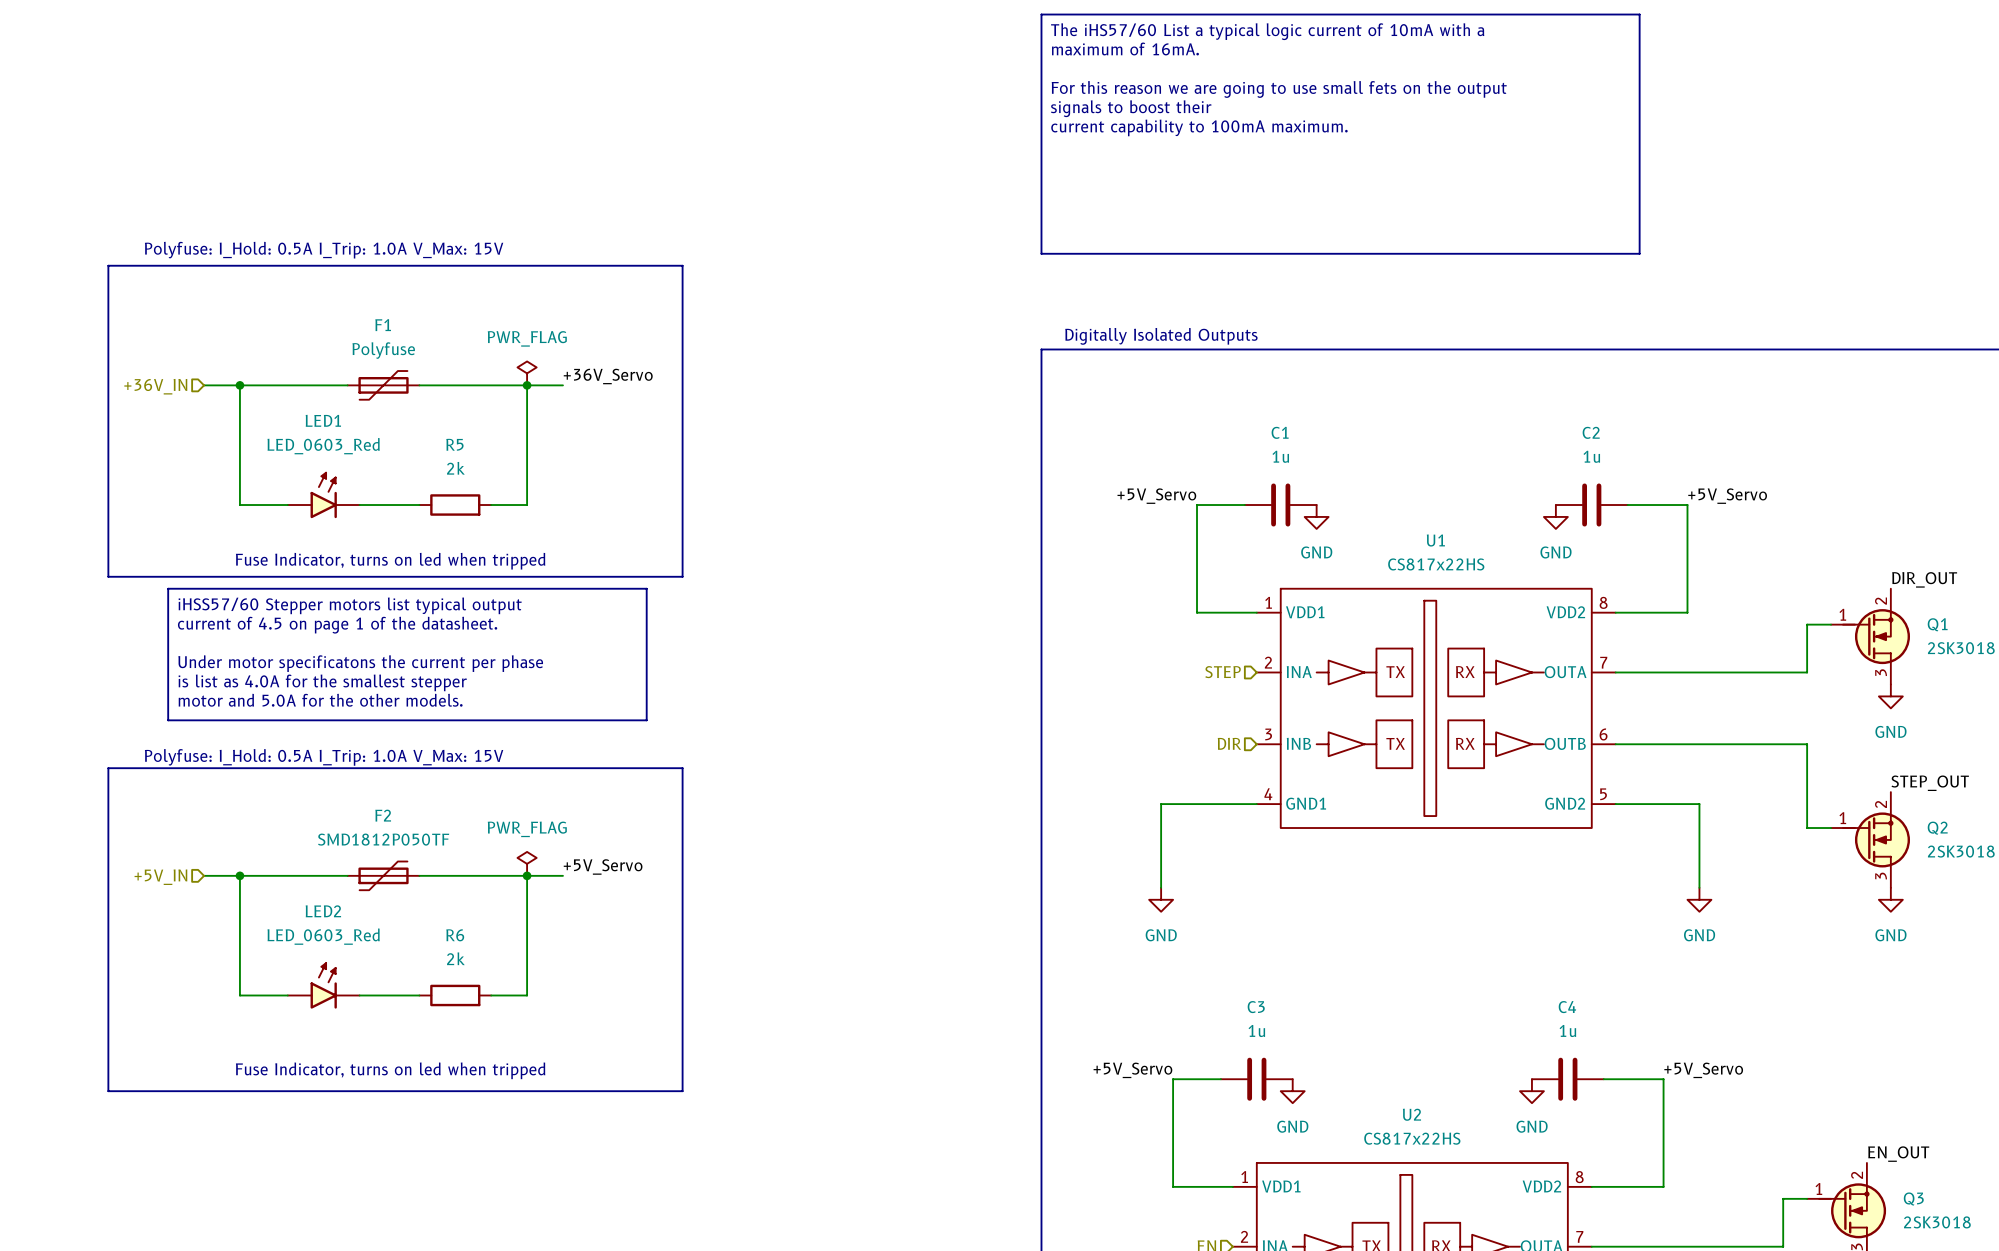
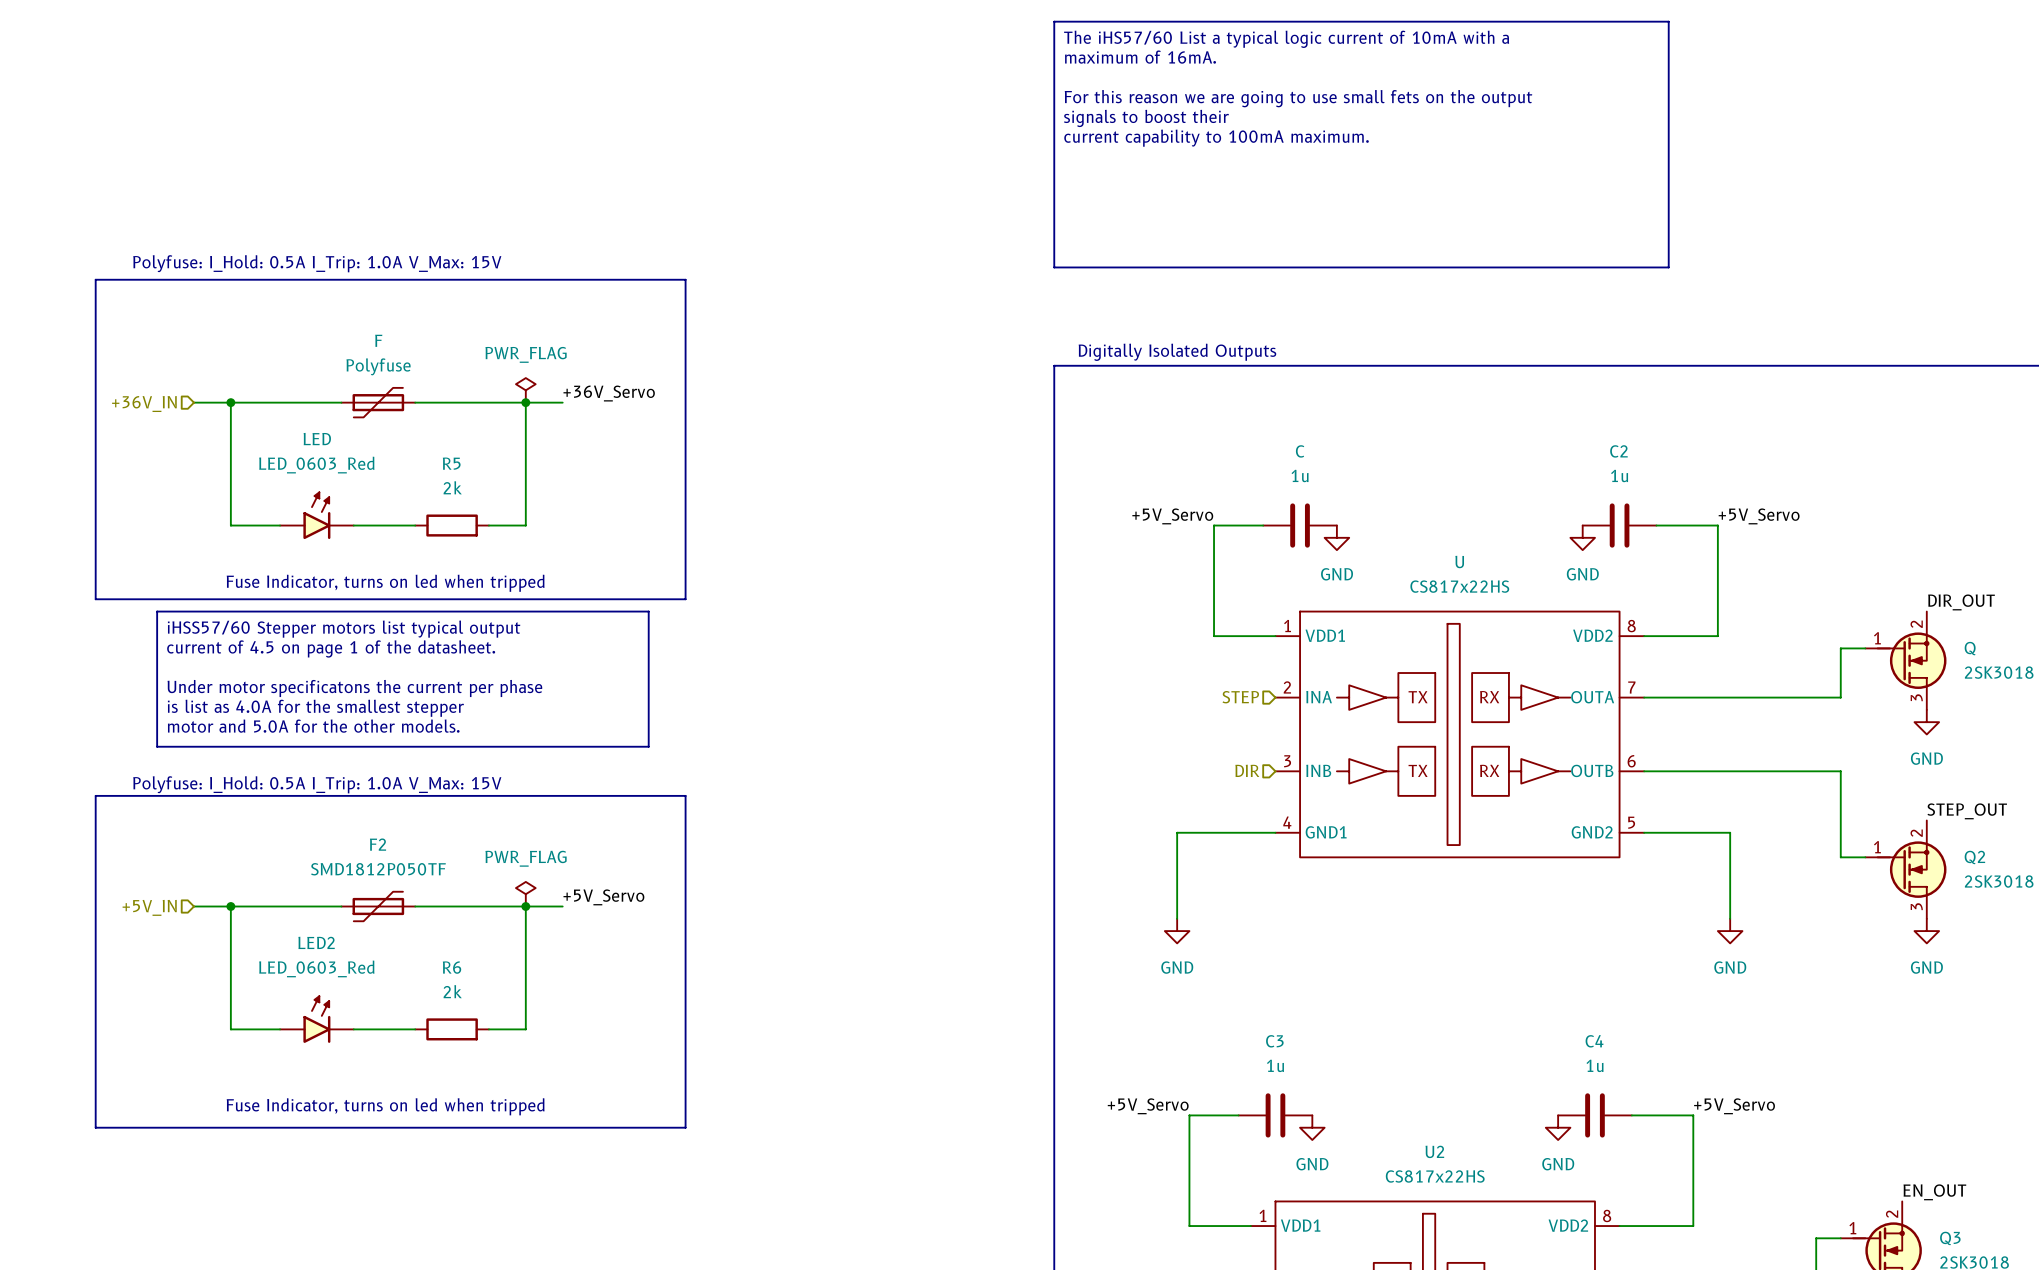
F1 name: F1 (383, 325) -> F (378, 340)
LED1 name: LED1 (323, 420) -> LED (317, 439)
C1 name: C1 (1280, 432) -> C (1300, 451)
U1 name: U1 (1435, 540) -> U (1459, 562)
Q1 name: Q1 (1937, 624) -> Q (1970, 648)

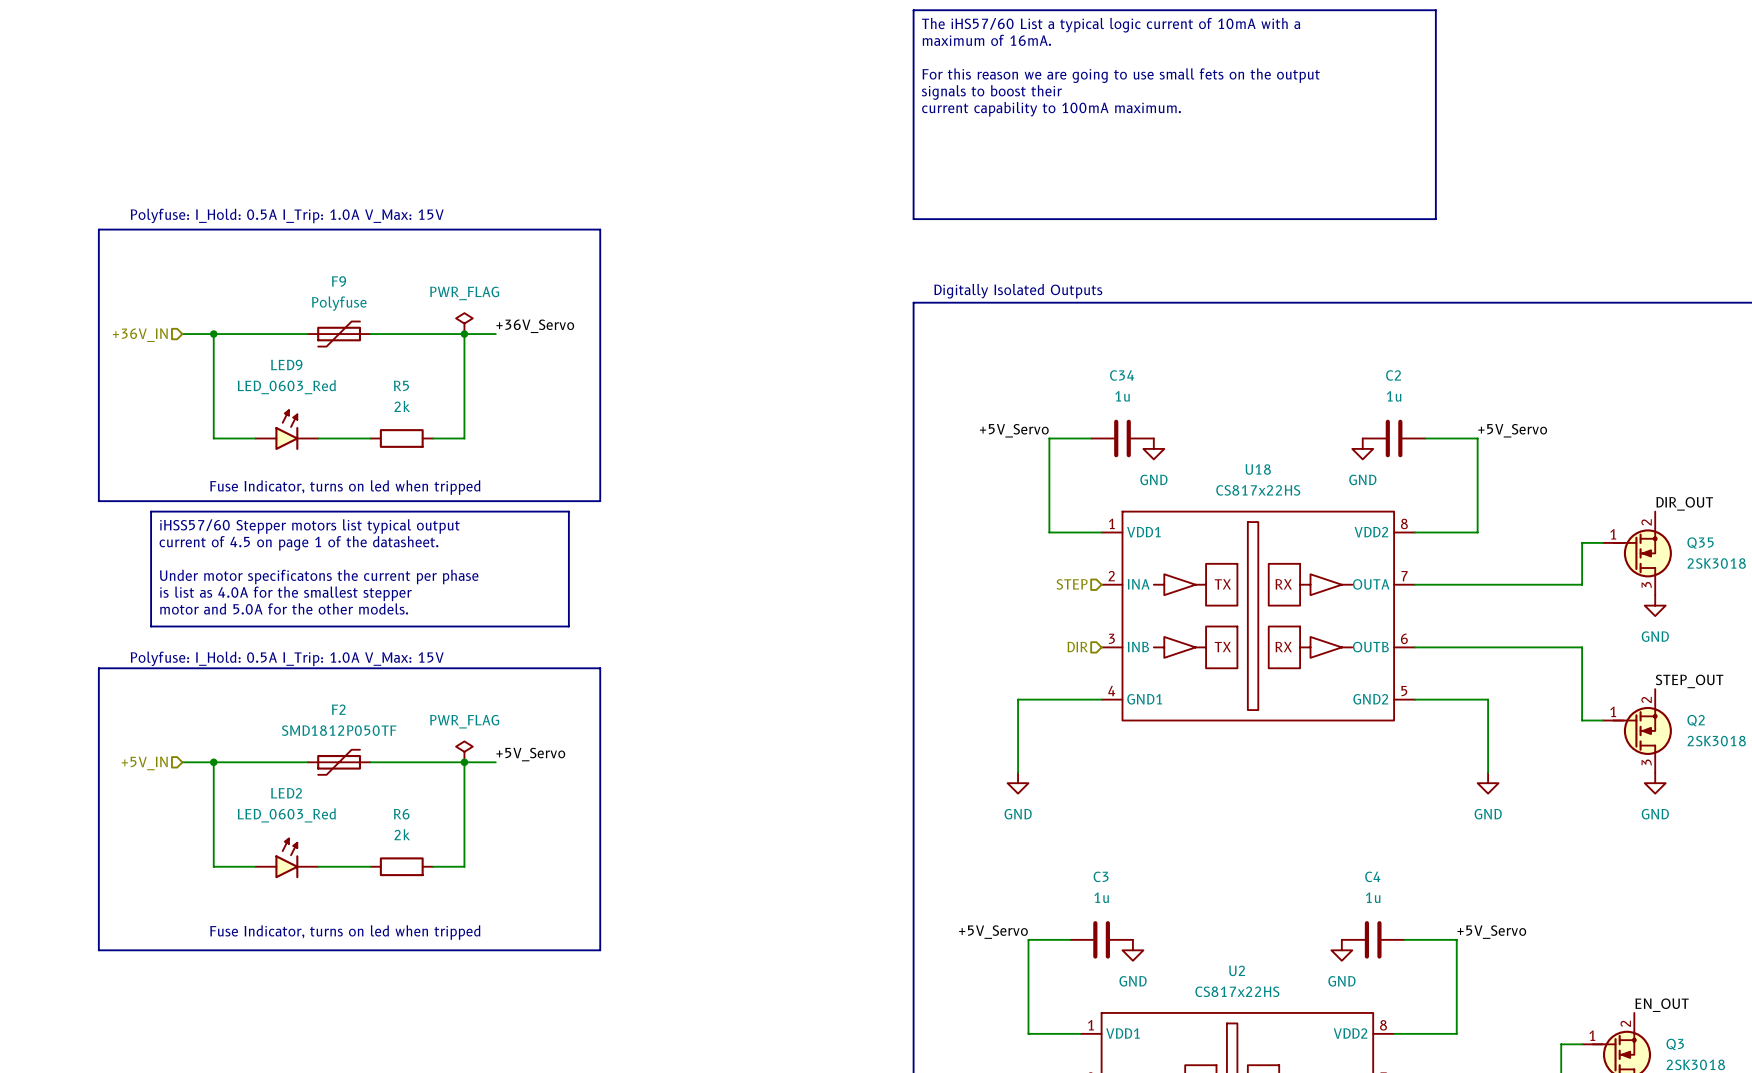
F name: F (378, 340) -> F9 (339, 281)
LED name: LED (317, 439) -> LED9 (286, 365)
C name: C (1300, 451) -> C34 (1122, 375)
U name: U (1459, 562) -> U18 (1258, 469)
Q name: Q (1970, 648) -> Q35 (1700, 543)

